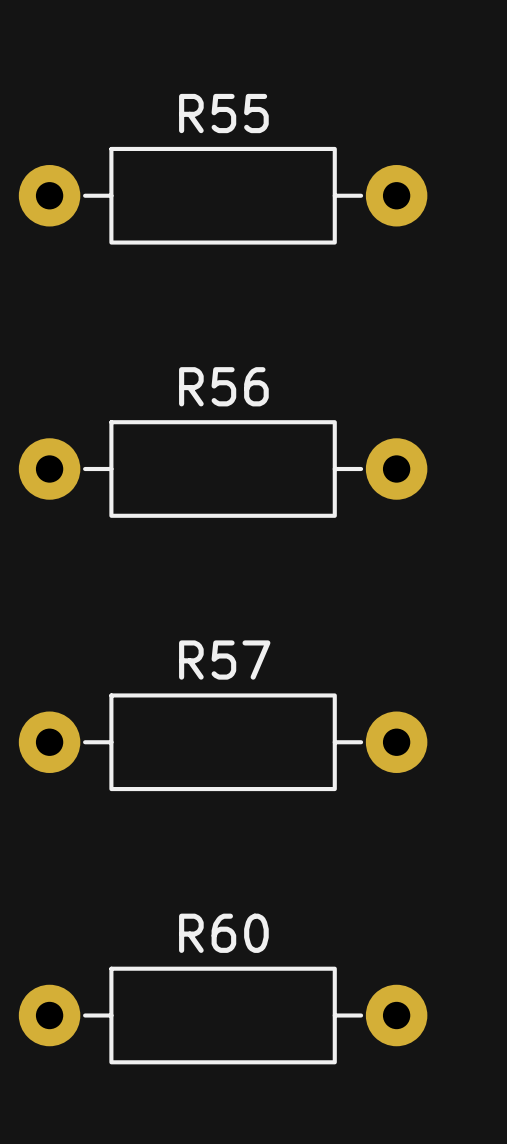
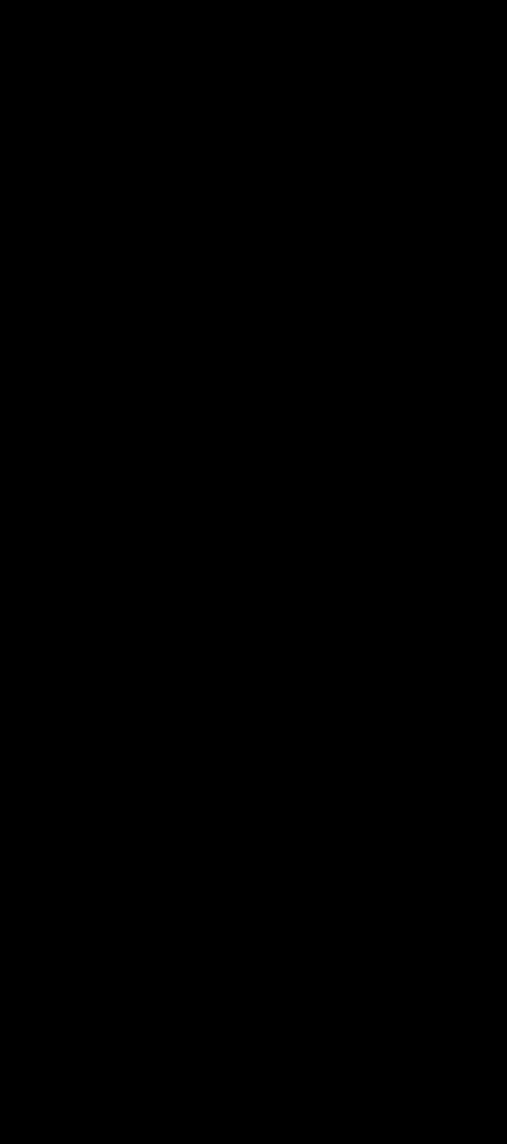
R55: (223, 195) -> none
R56: (223, 469) -> none
R57: (223, 742) -> none
R60: (223, 1015) -> none

